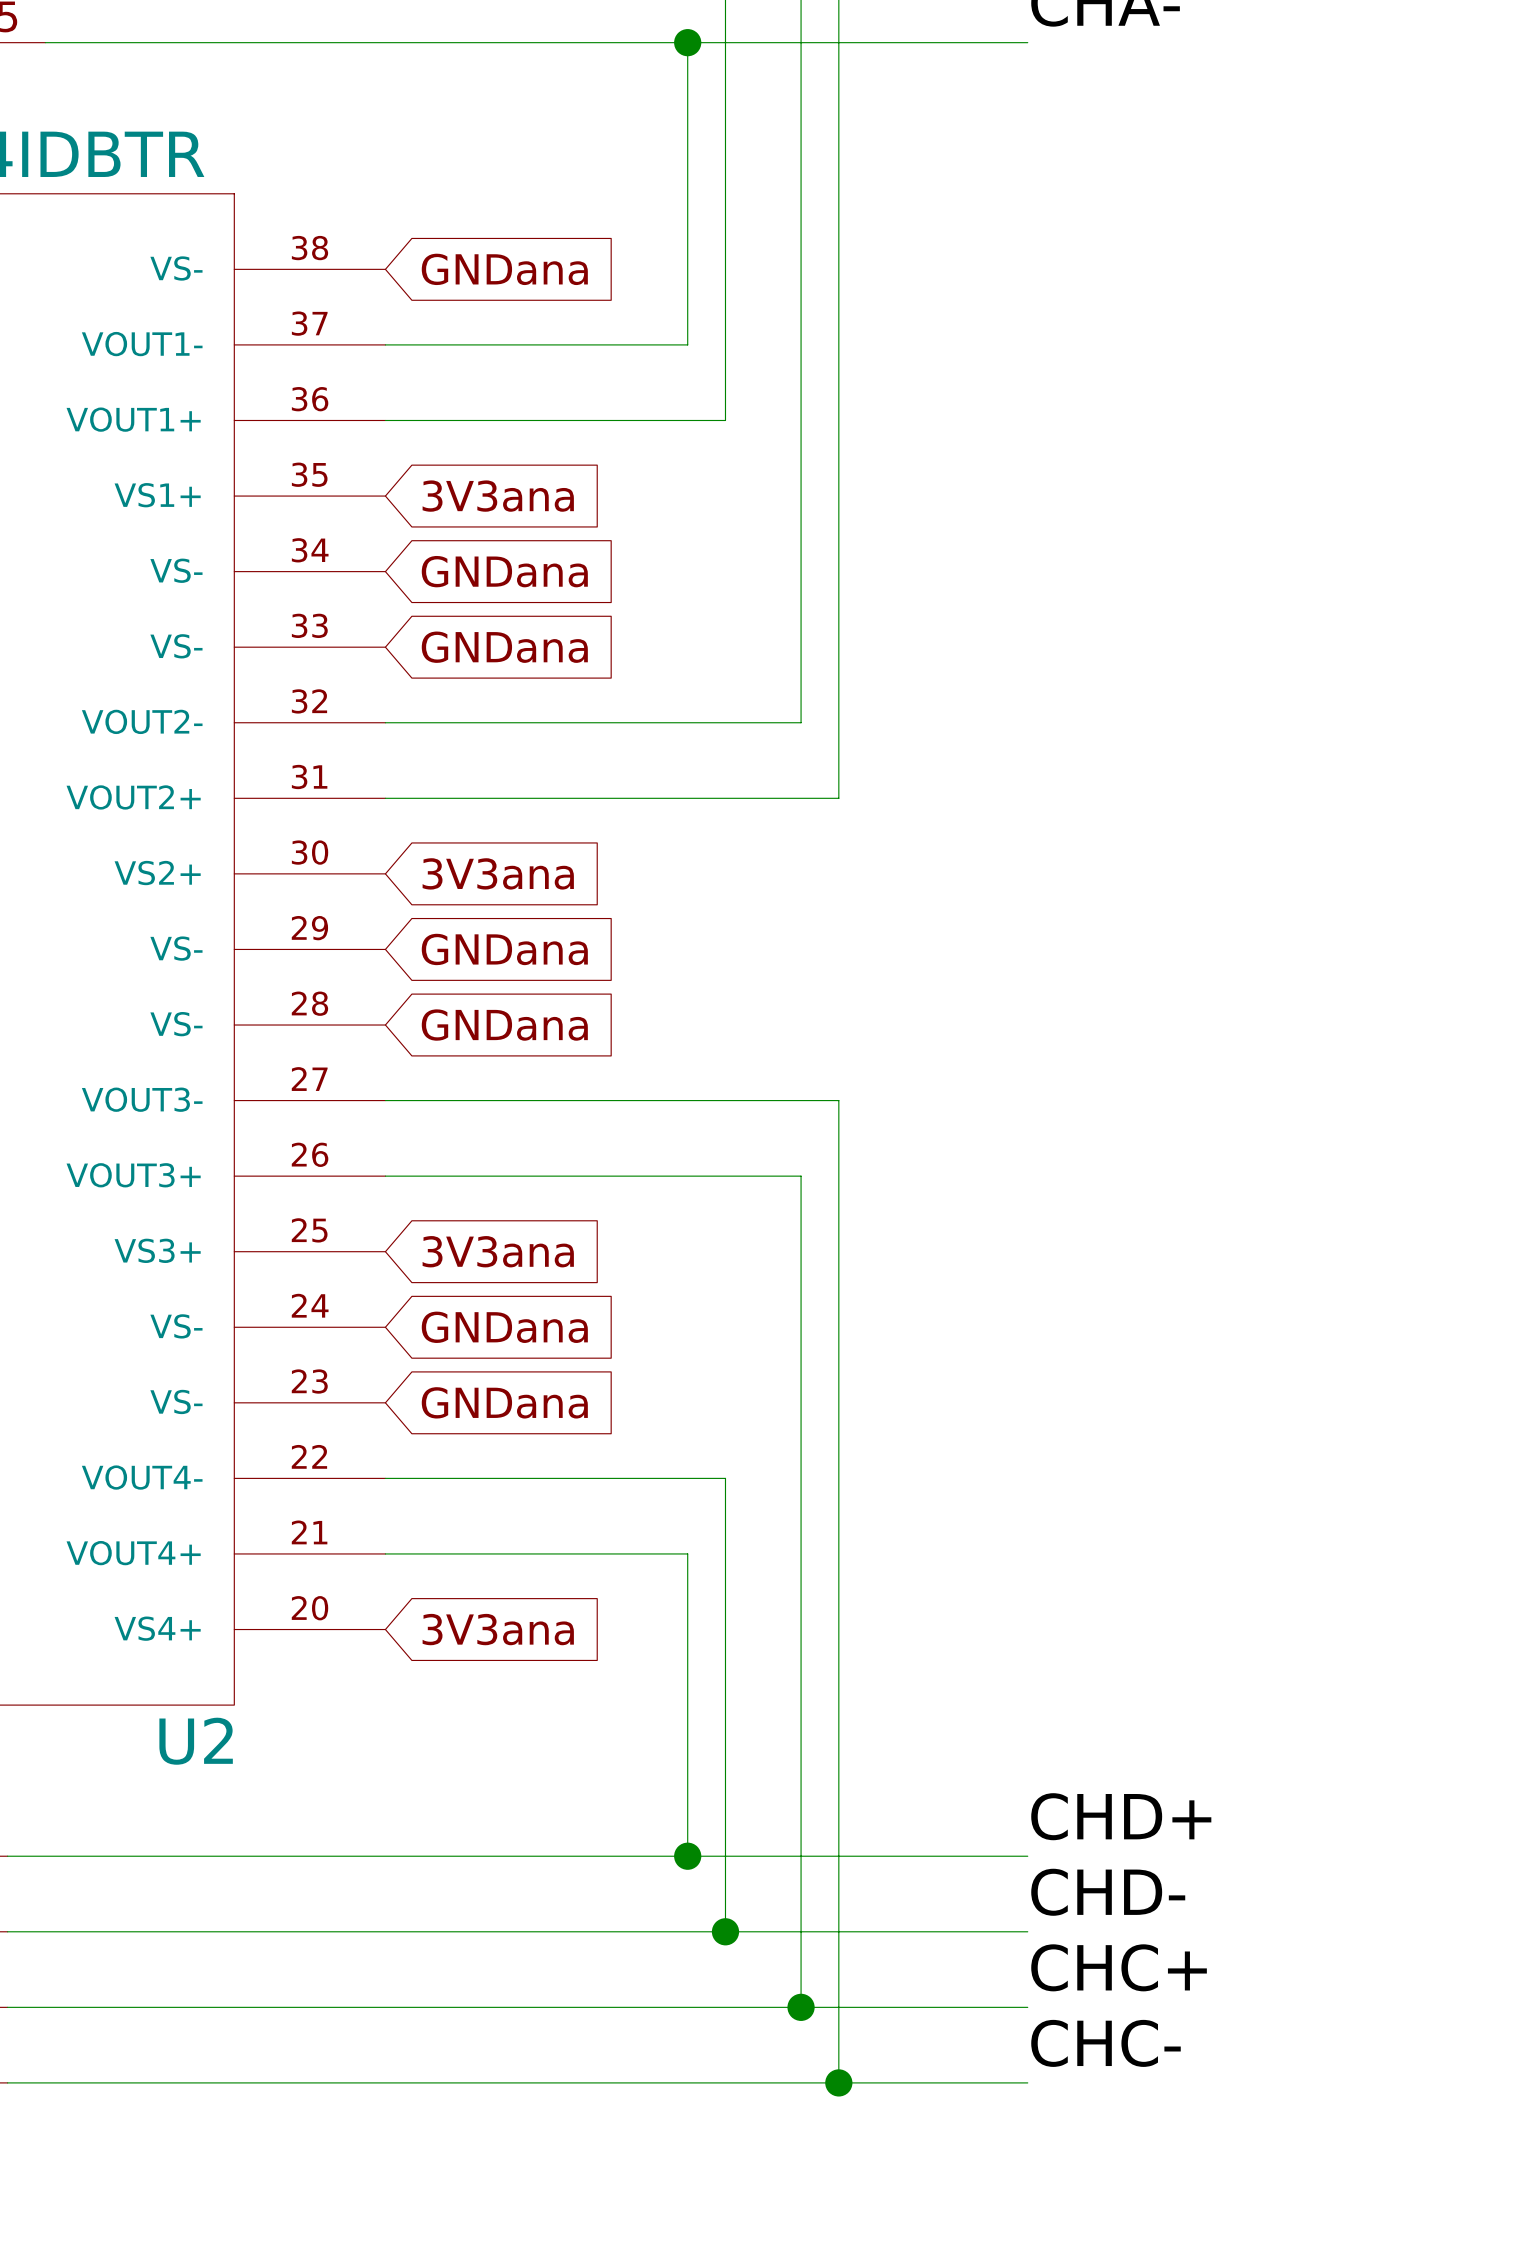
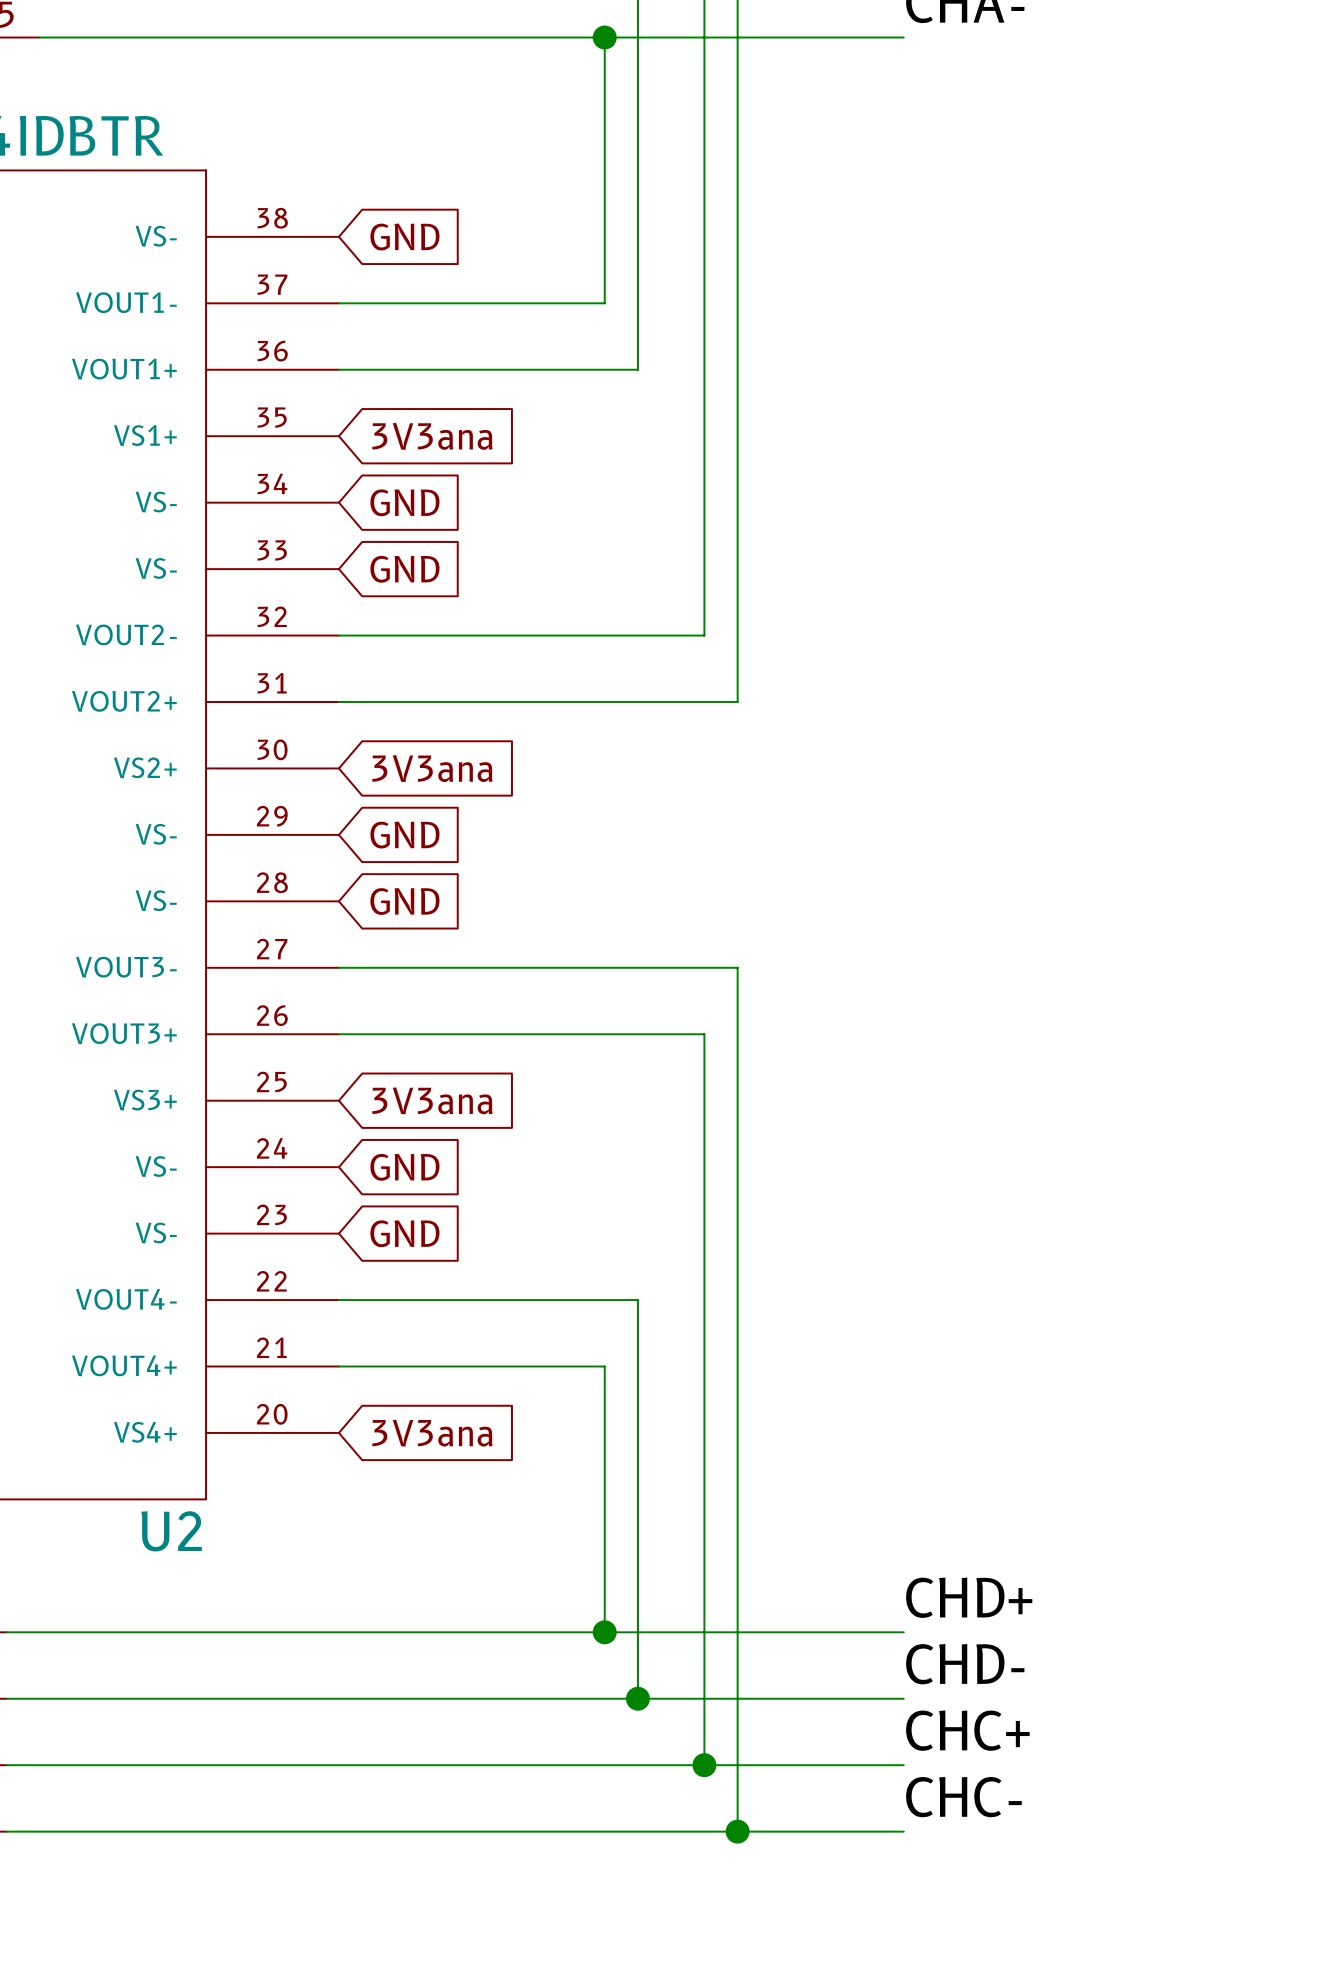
global label: GNDana (504, 269) -> GND (404, 237)
global label: GNDana (504, 571) -> GND (404, 502)
global label: GNDana (504, 647) -> GND (404, 569)
global label: GNDana (504, 949) -> GND (404, 835)
global label: GNDana (504, 1025) -> GND (404, 901)
global label: GNDana (504, 1327) -> GND (404, 1167)
global label: GNDana (504, 1402) -> GND (404, 1233)

